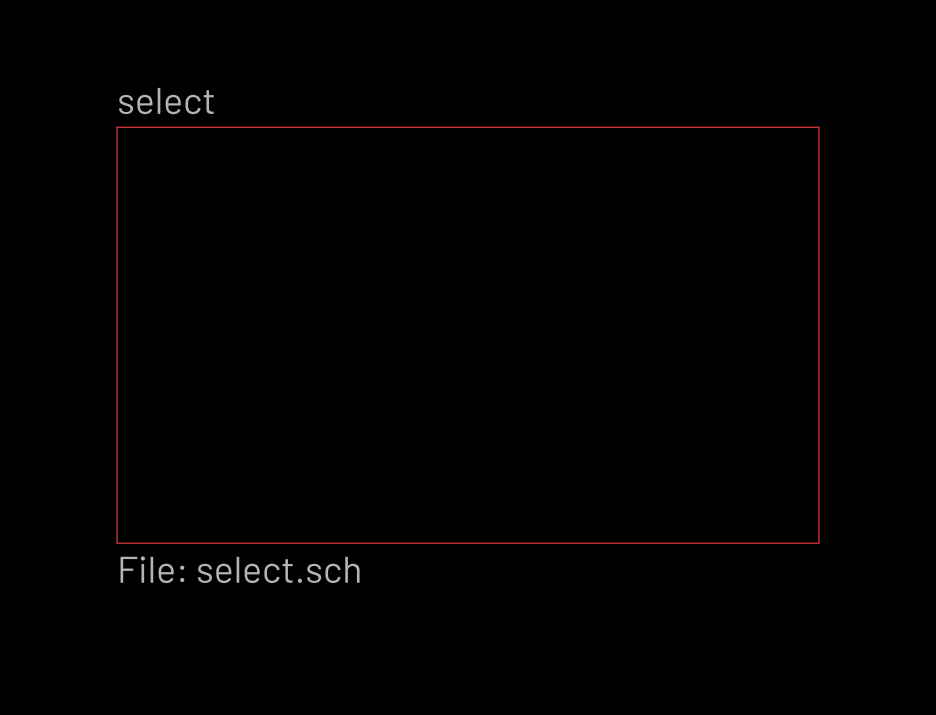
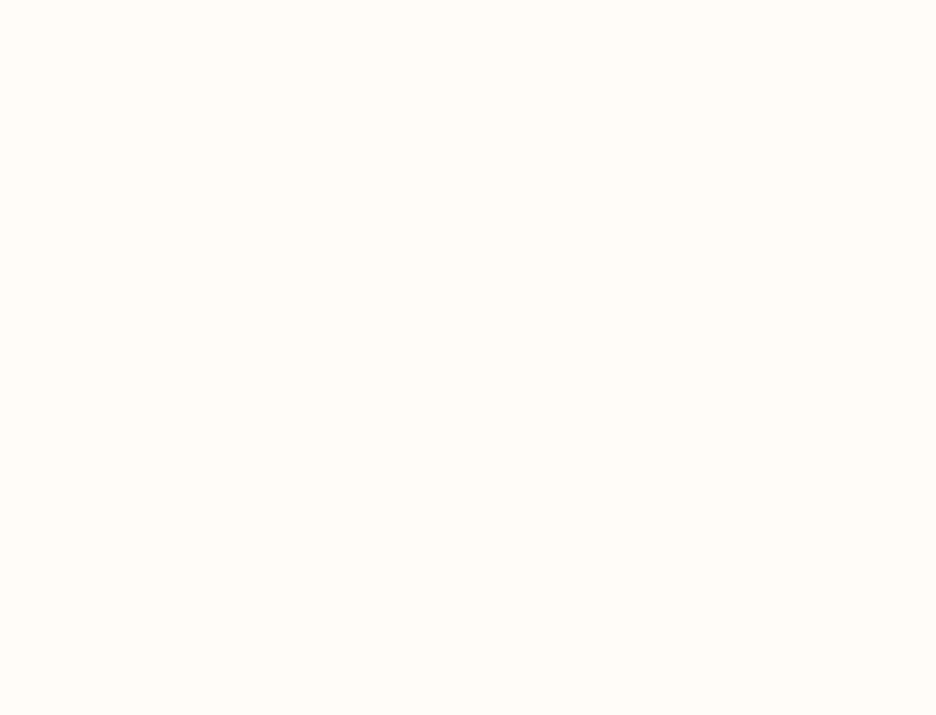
sheet select: File: select.sch (468, 335) -> none

